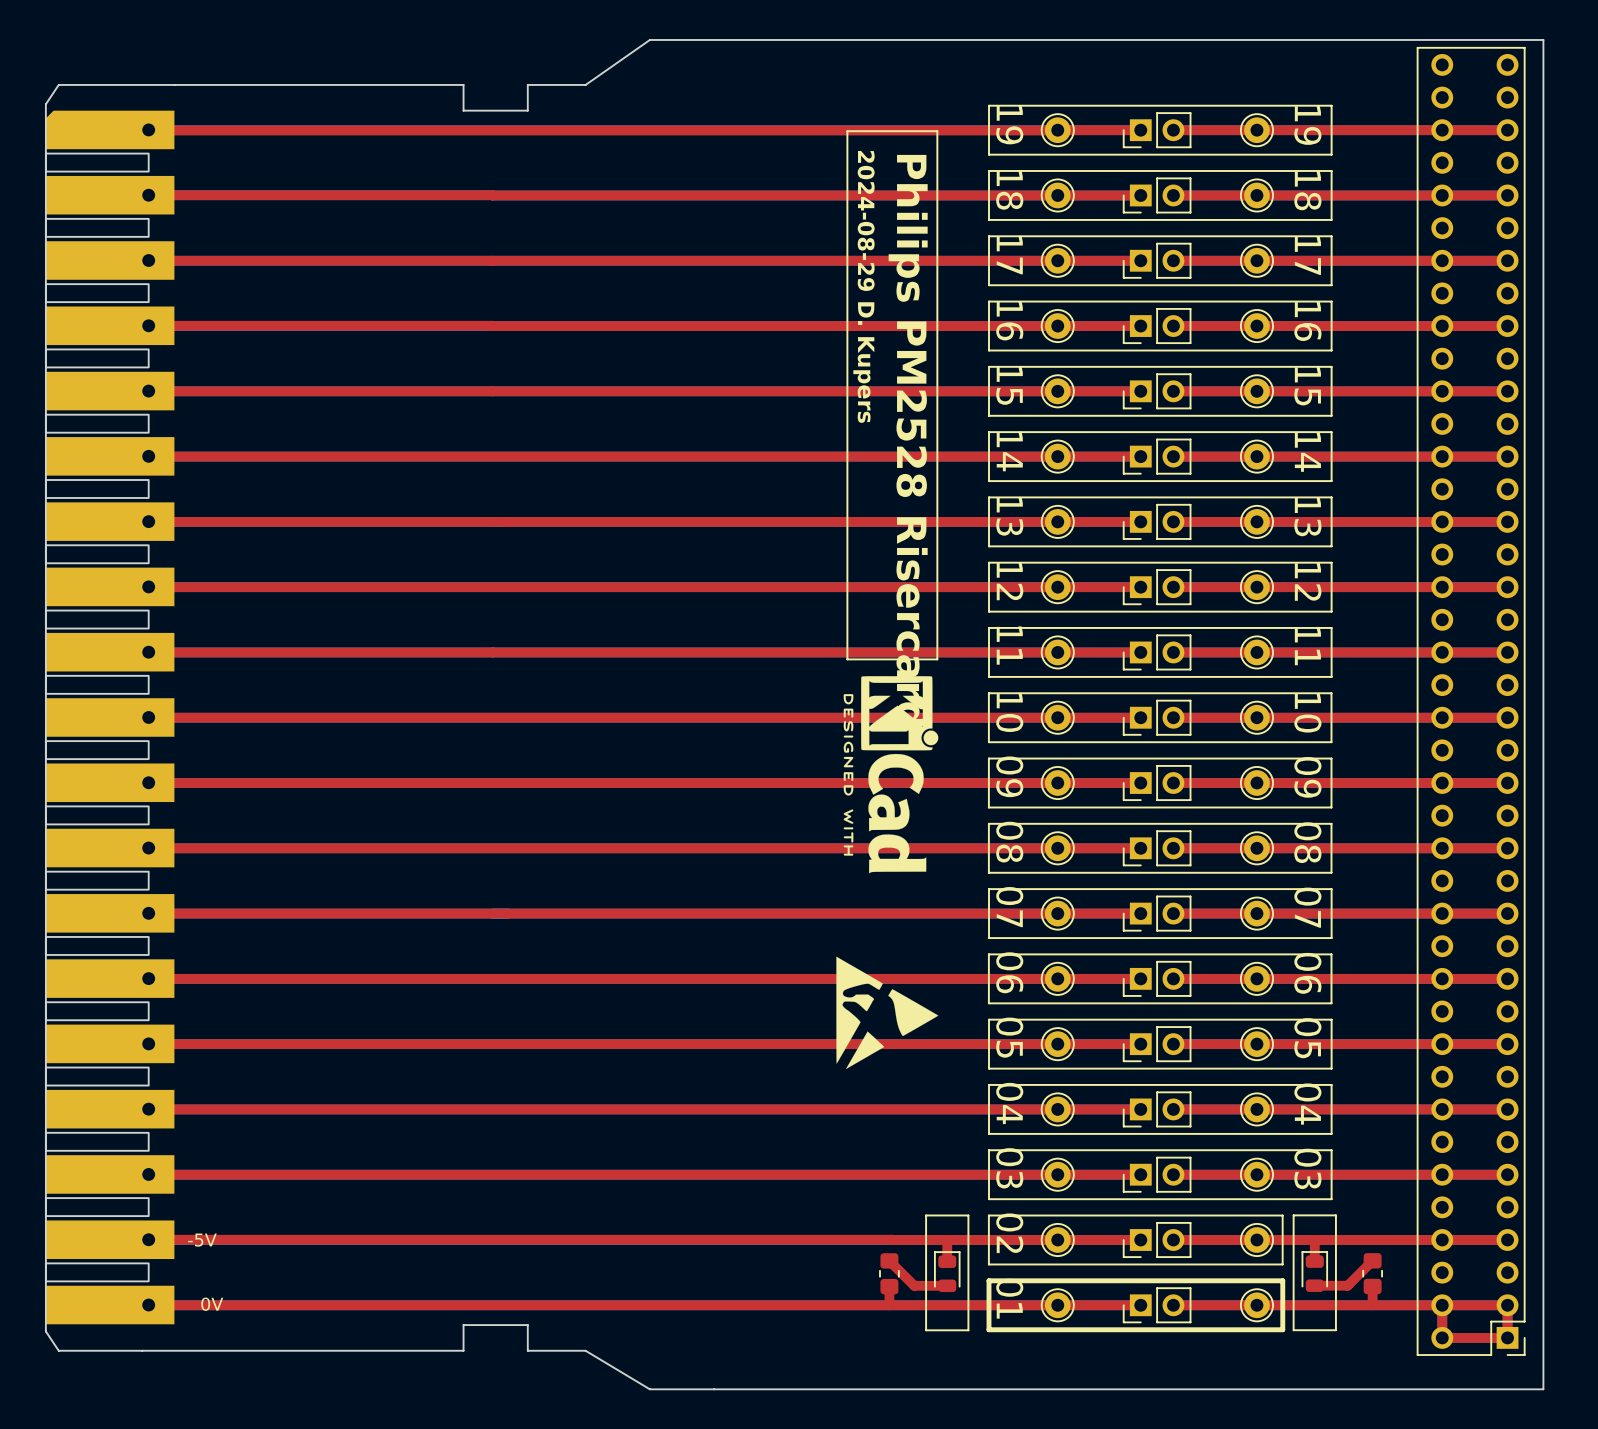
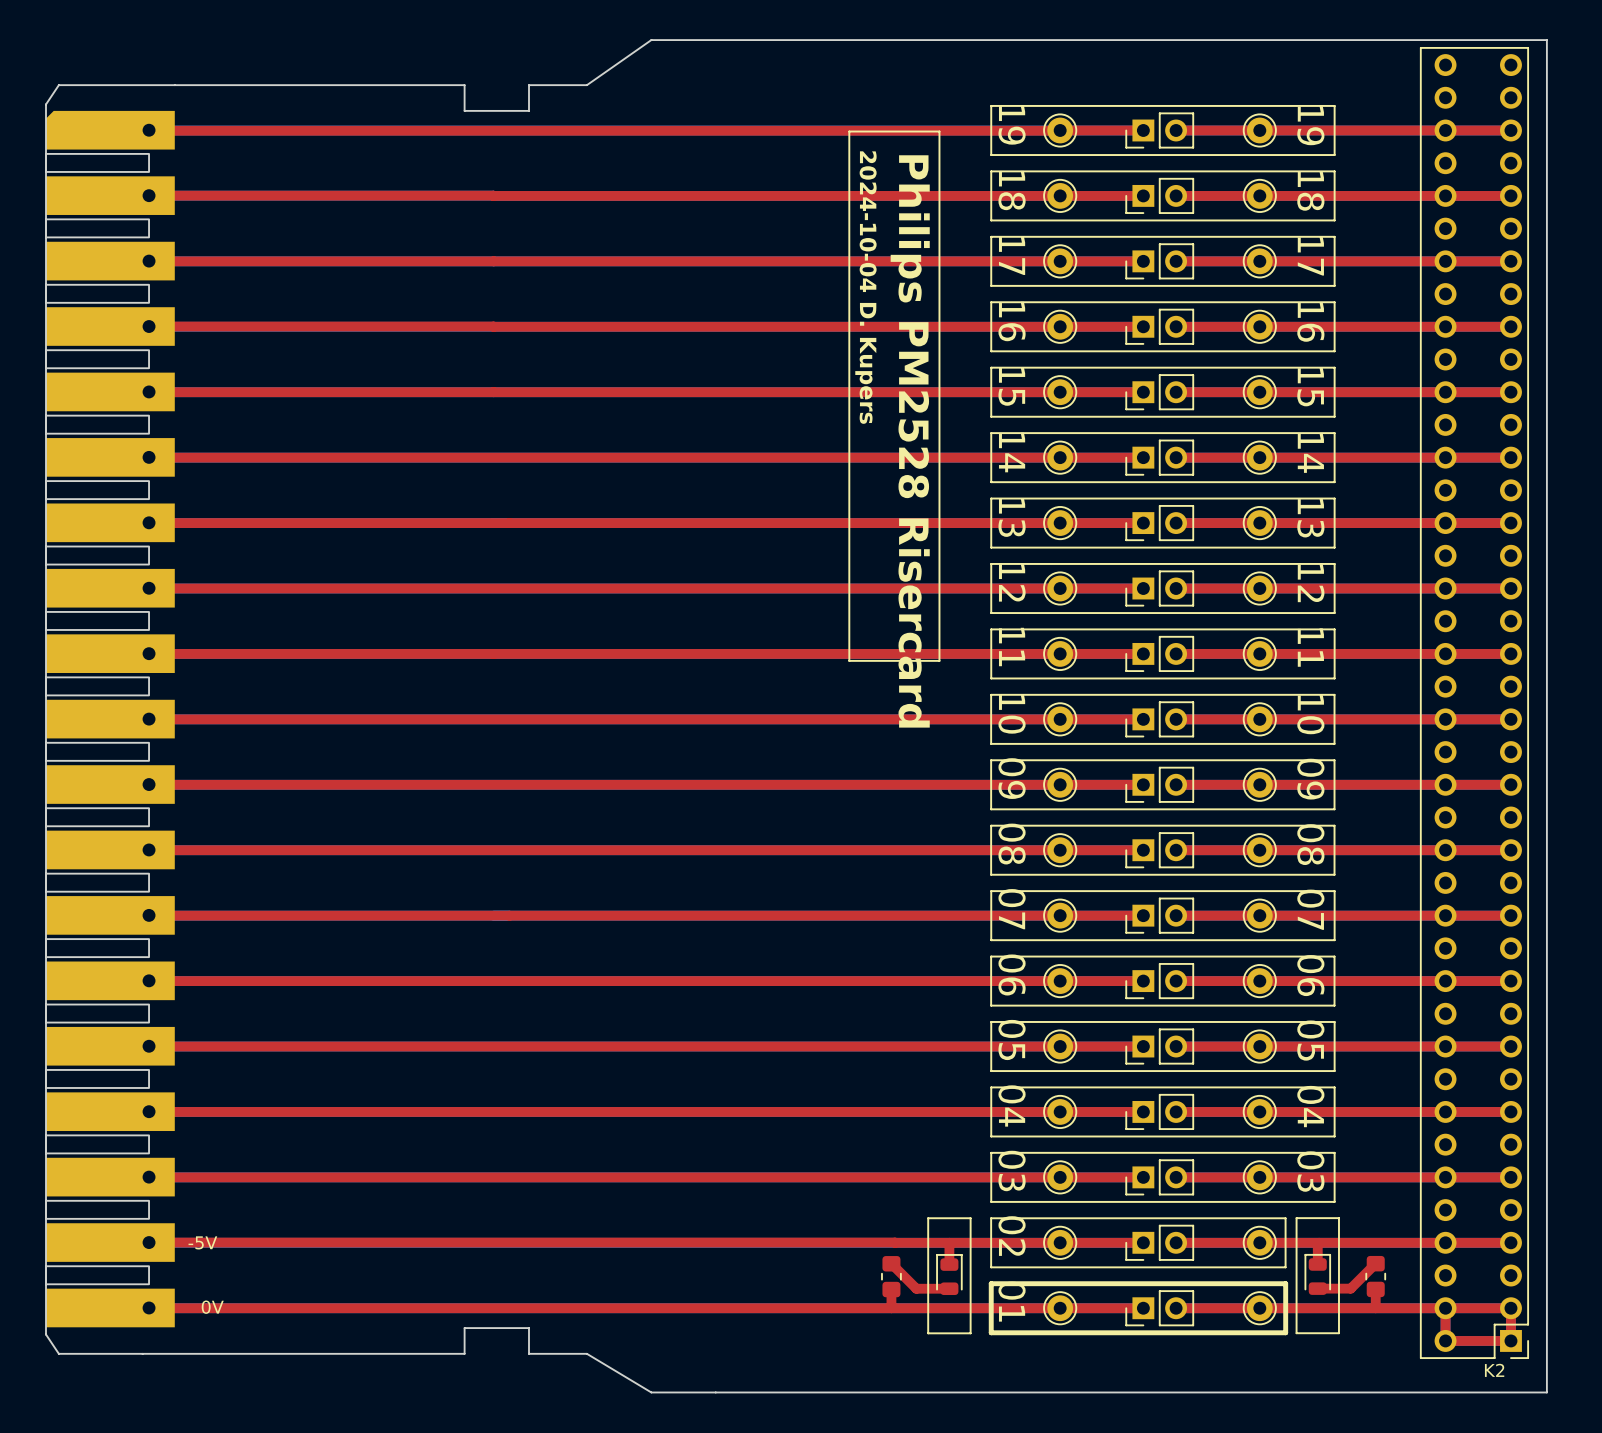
text: 2024-08-29 D. Kupers (863, 286) -> 2024-10-04 D. Kupers (865, 287)
drawing: [843, 676, 939, 874] -> none
drawing: [836, 956, 939, 1069] -> none
K2 name: none -> K2 (1494, 1370)

